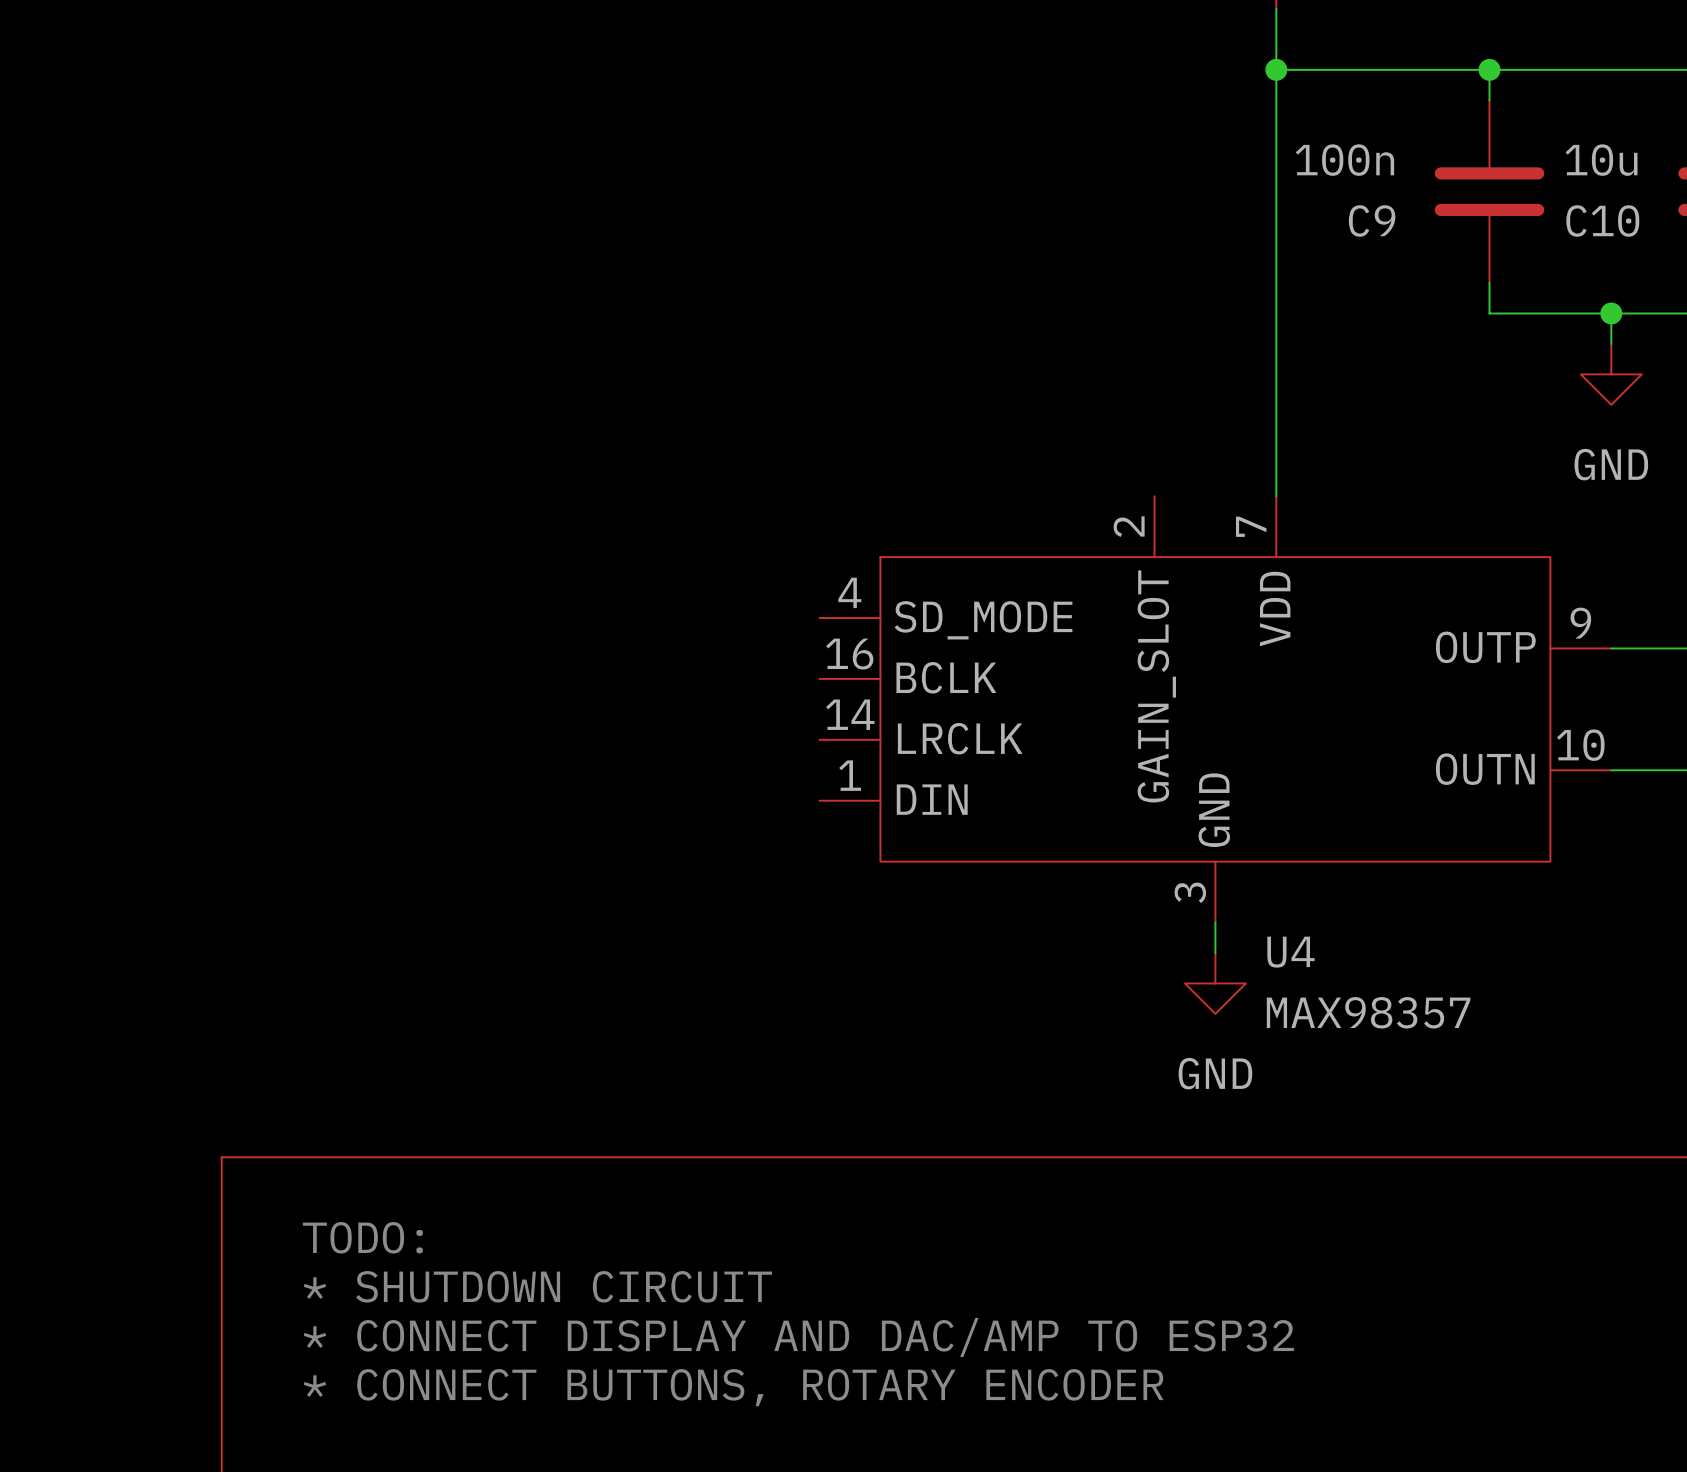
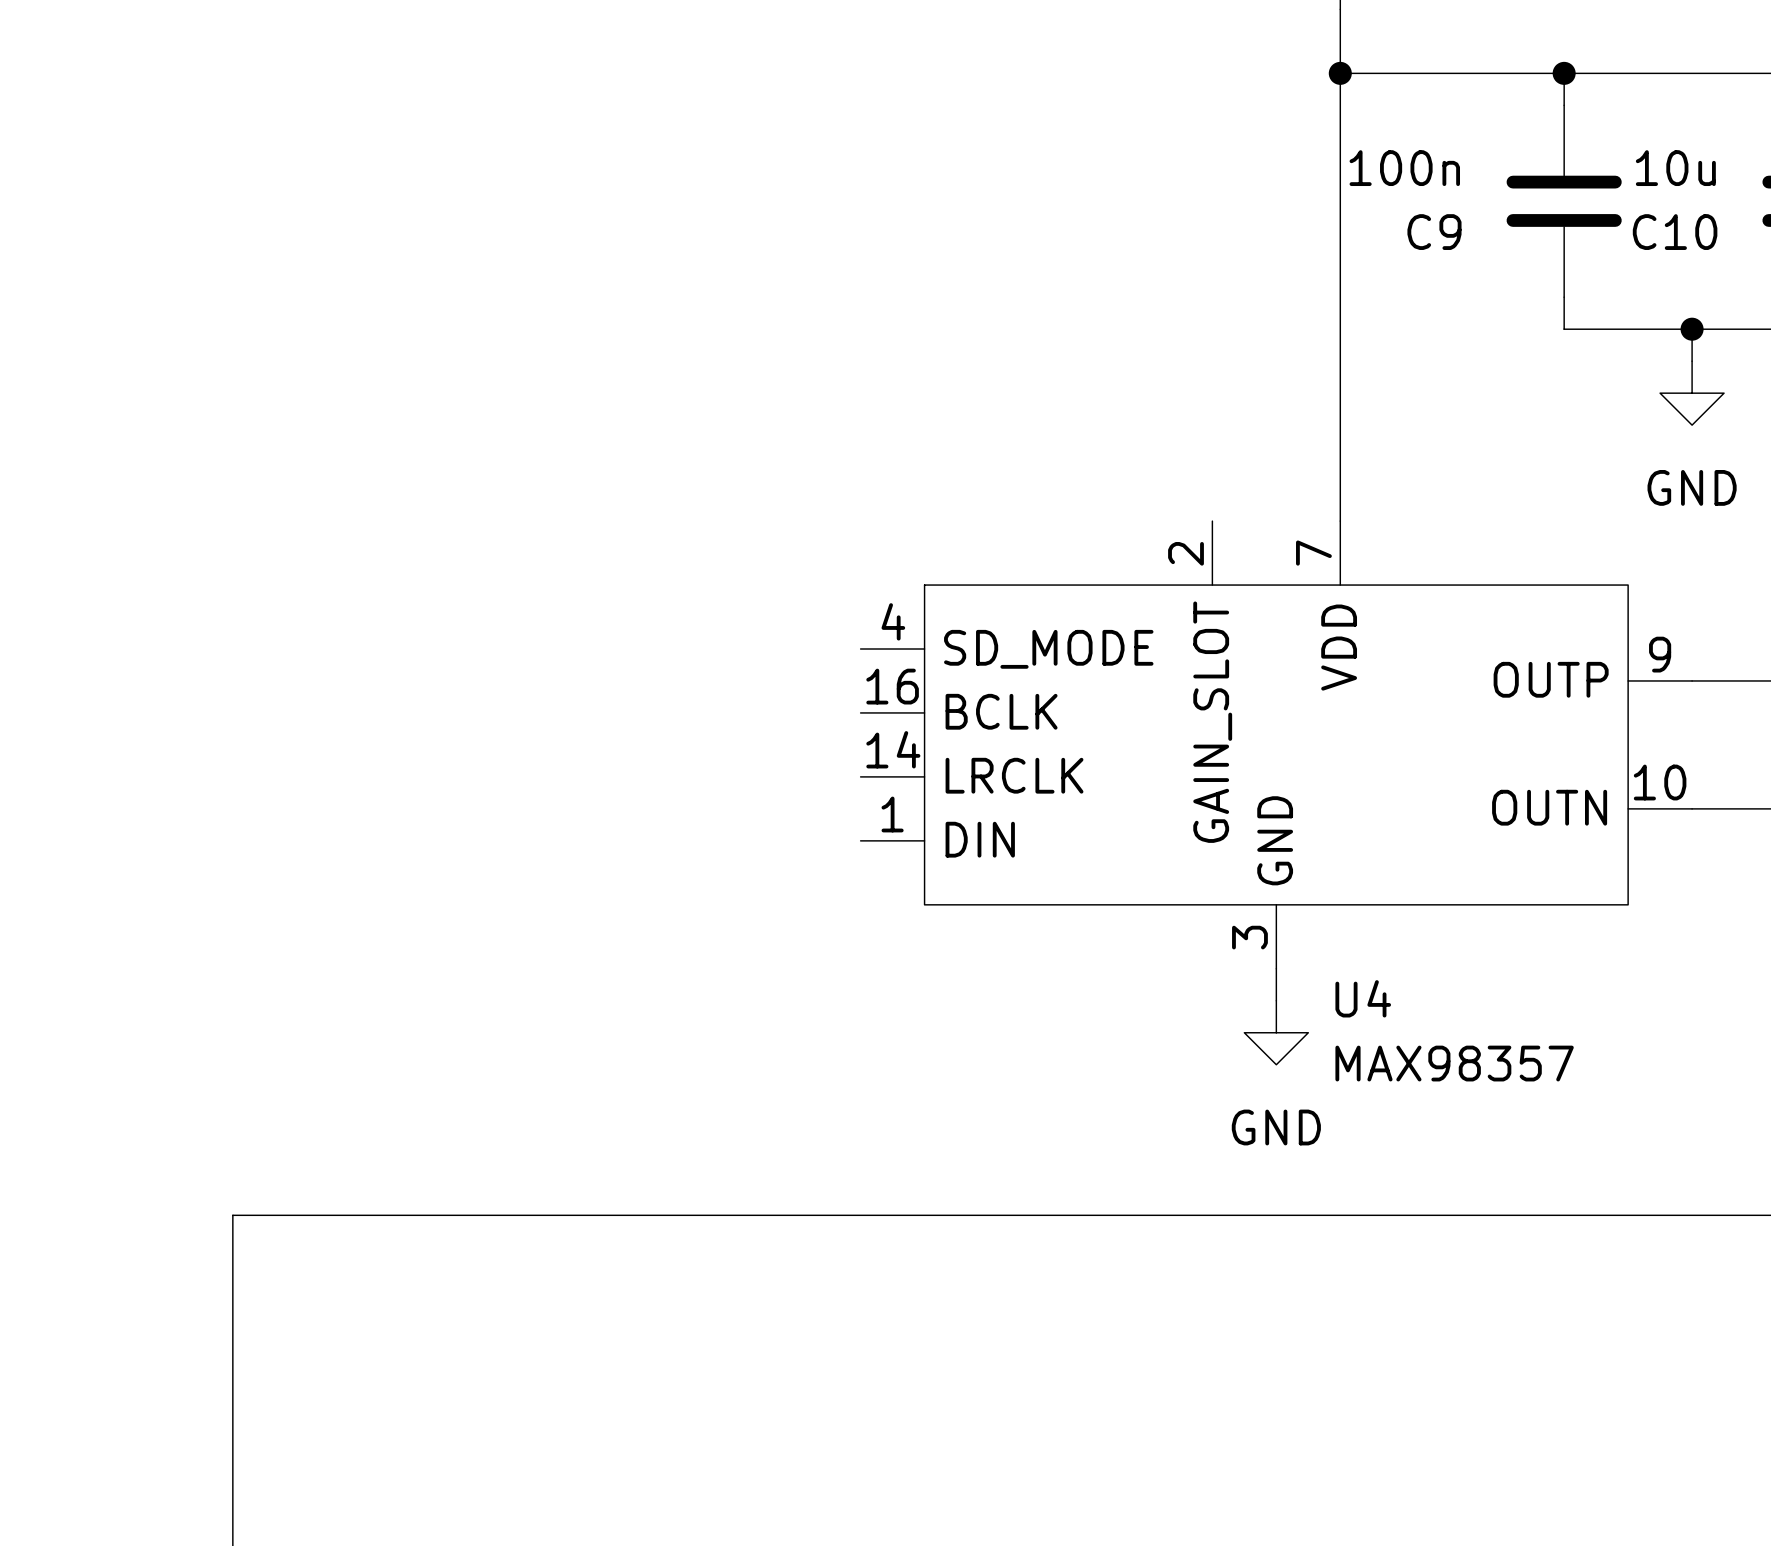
text: TODO: (362, 1237) -> none
text: * SHUTDOWN CIRCUIT (537, 1286) -> none
text: * CONNECT DISPLAY AND DAC/AMP TO ESP32 (798, 1337) -> none
text: * CONNECT BUTTONS, ROTARY ENCODER (733, 1387) -> none

